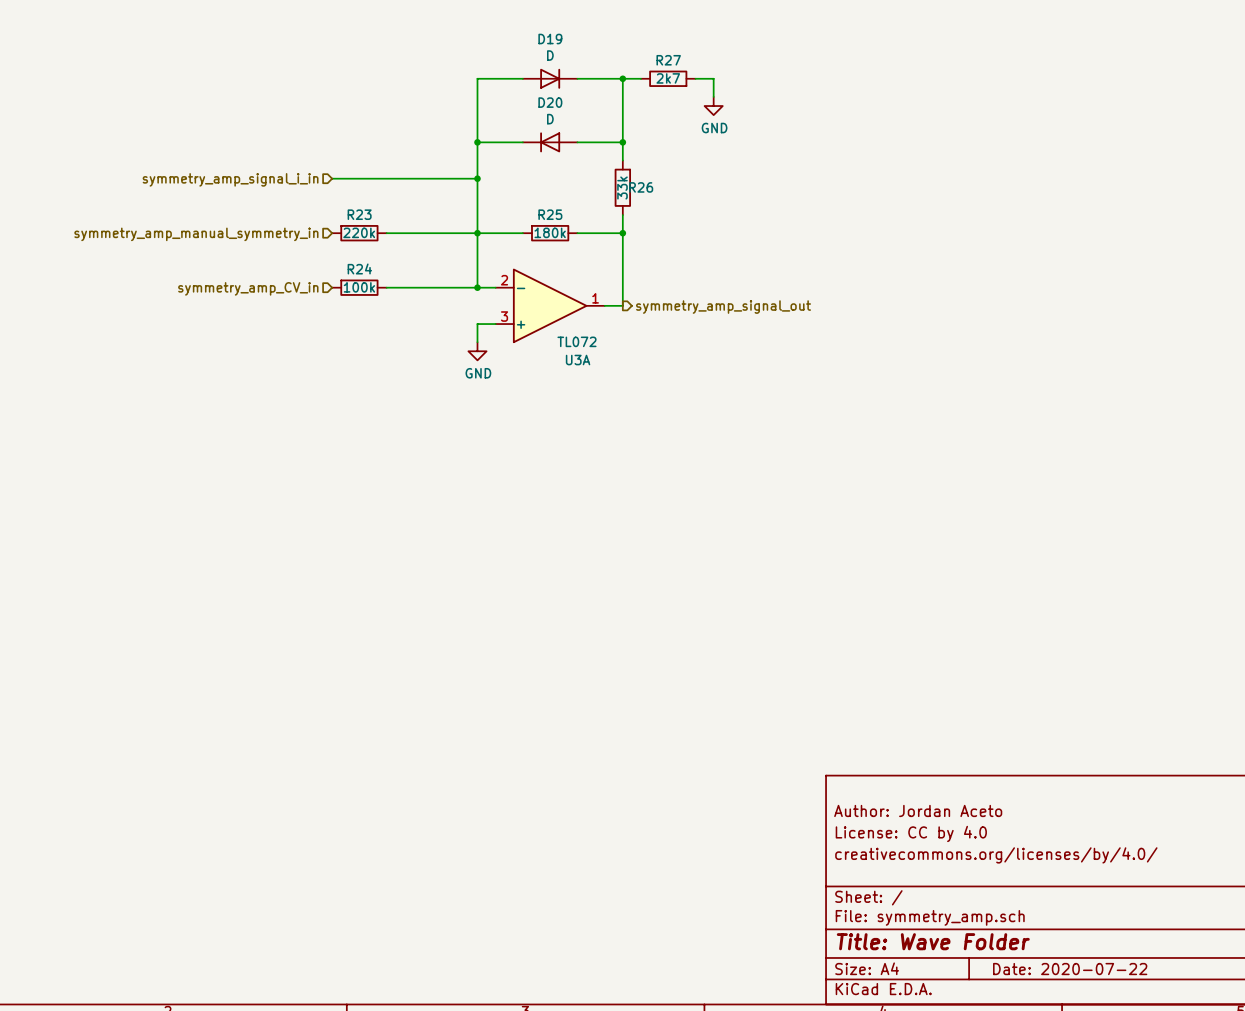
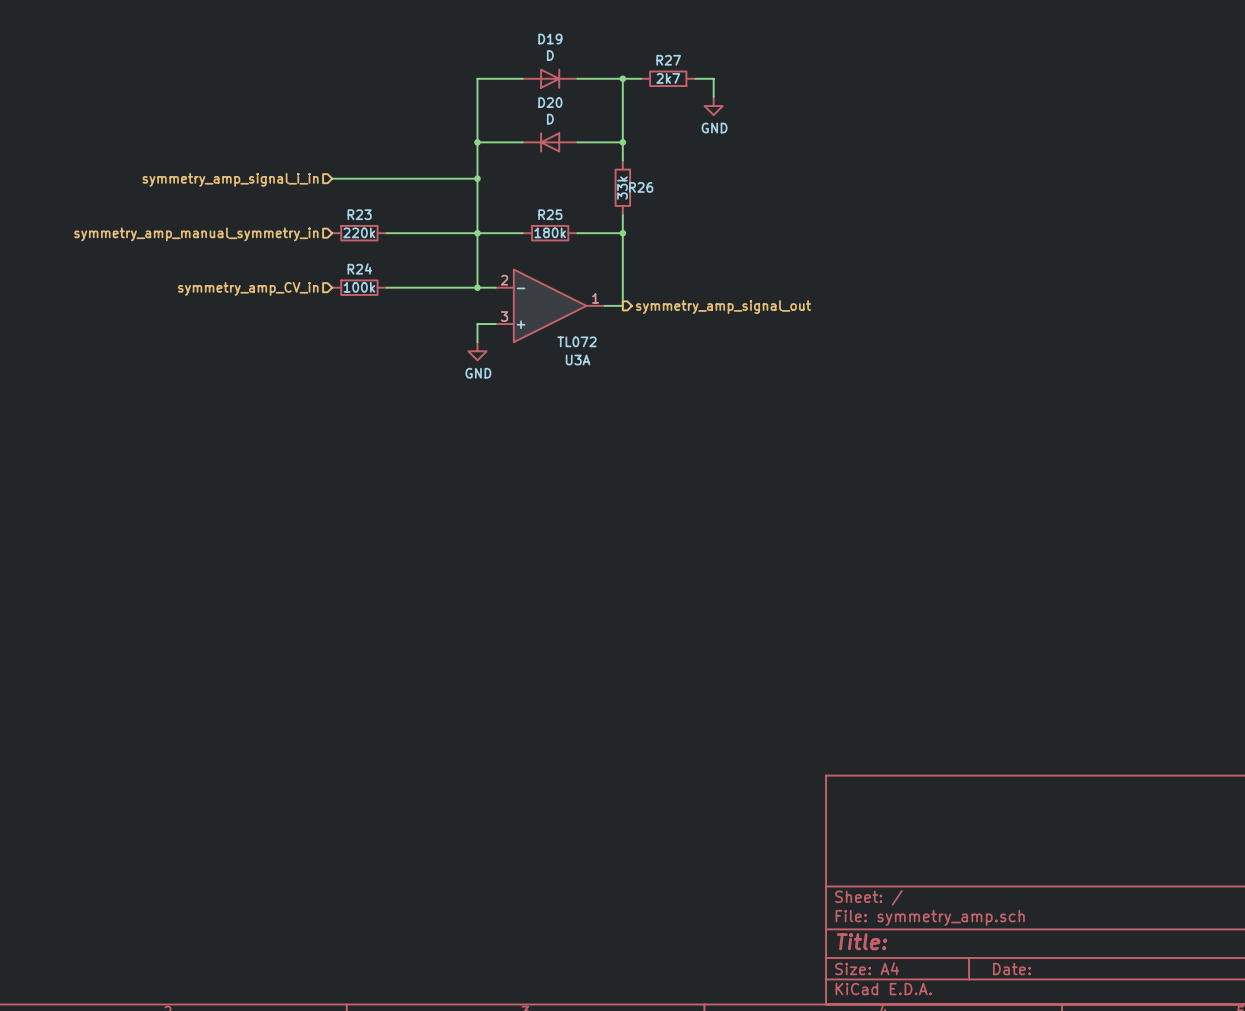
title block: Author: Jordan Aceto (918, 810) -> none
title block: License: CC by 4.0 (911, 833) -> none
title block: creativecommons.org/licenses/by/4.0/ (996, 855) -> none
title block: Title: Wave Folder (933, 941) -> Title: (862, 941)
title block: Date: 2020-07-22 (1070, 969) -> Date: (1011, 969)

